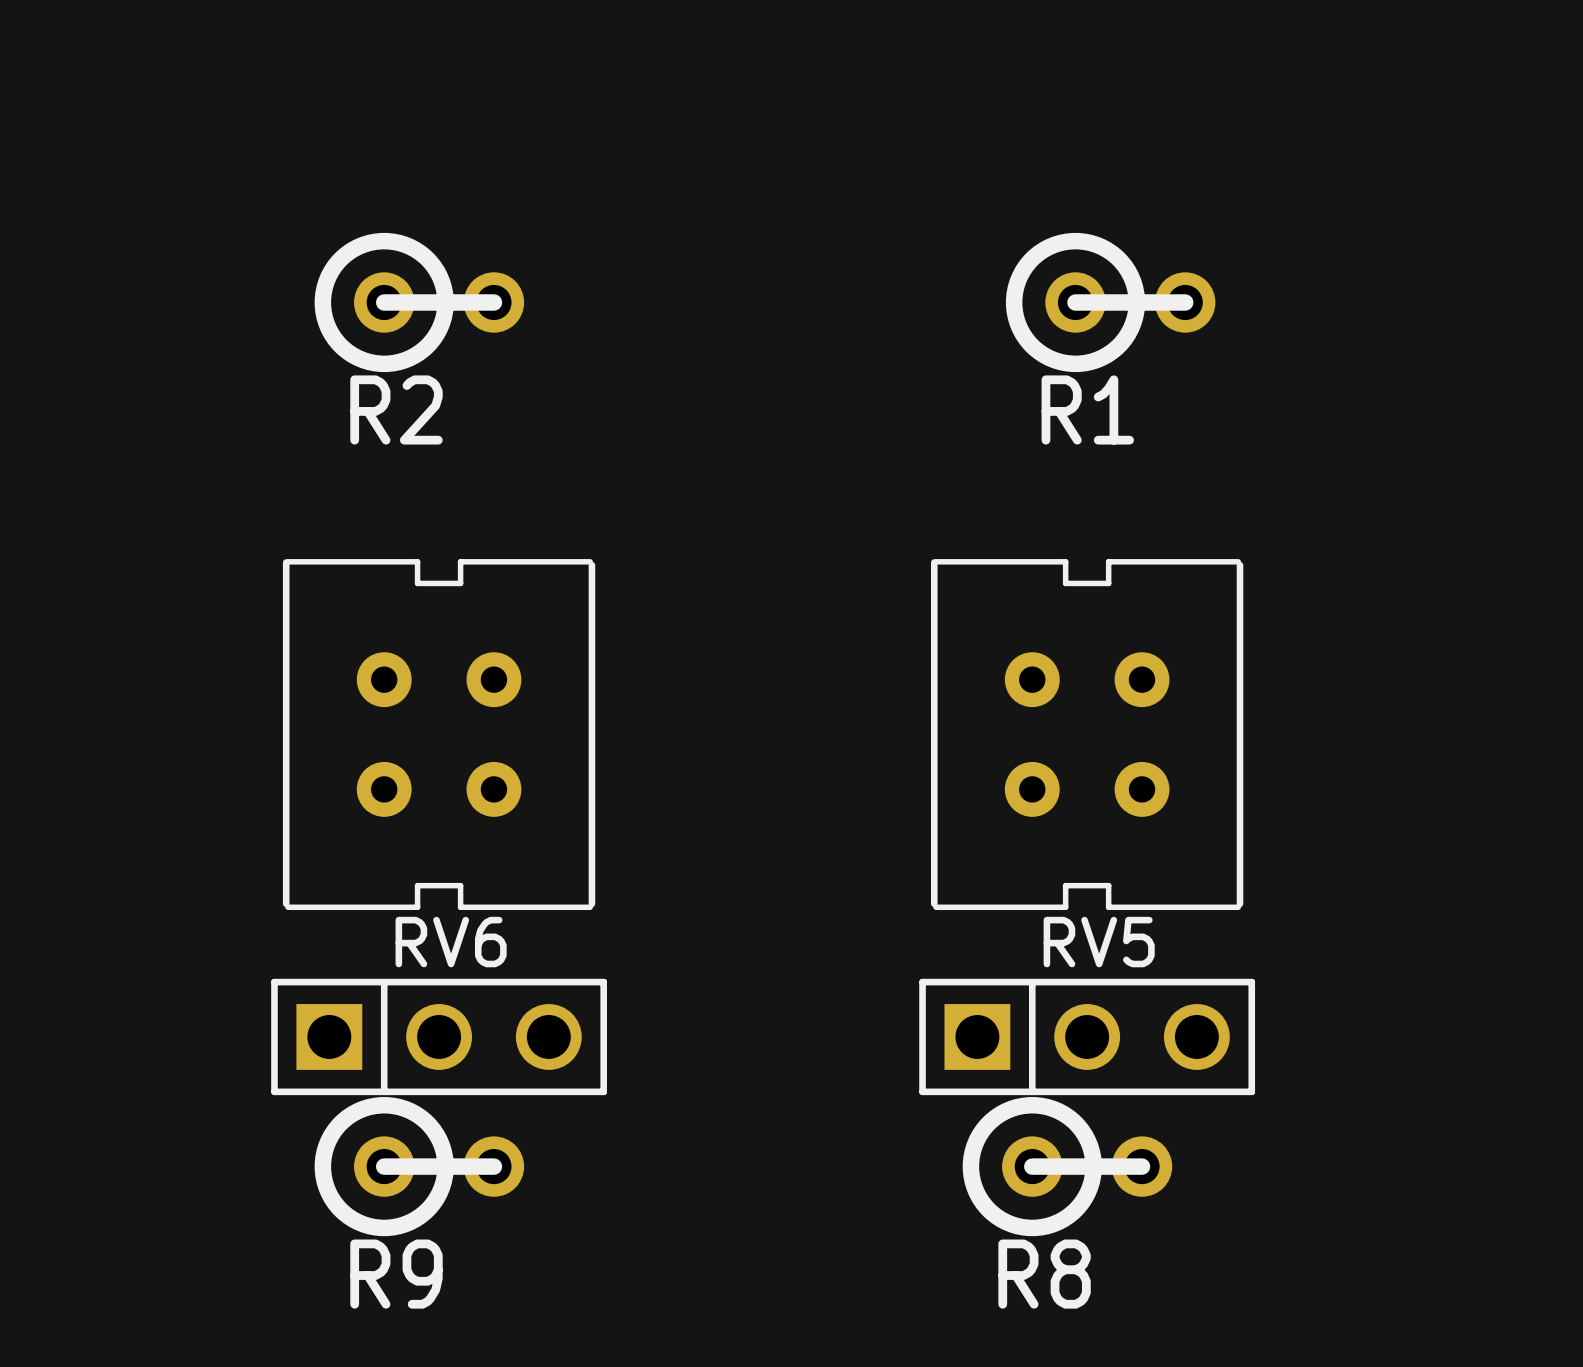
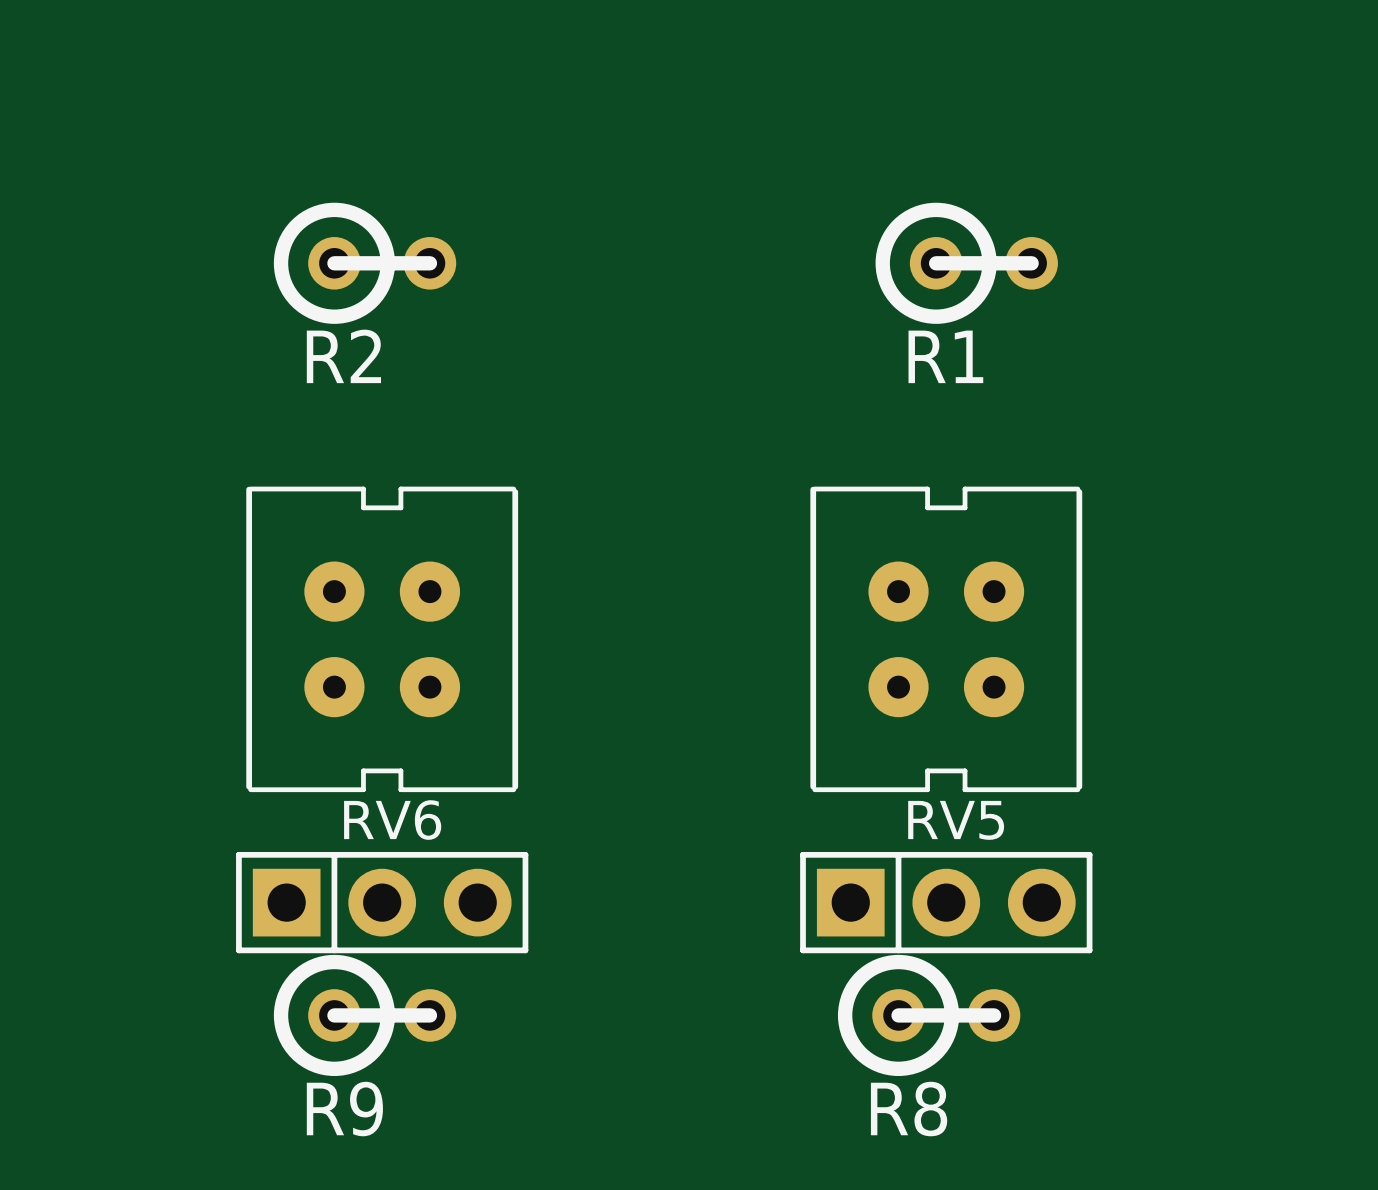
part footprint: [282, 559, 596, 911] -> [246, 486, 519, 793]
part footprint: [930, 559, 1244, 911] -> [810, 486, 1083, 793]
RV6 footprint: [271, 978, 607, 1096] -> [236, 851, 529, 954]
RV5 footprint: [919, 978, 1256, 1096] -> [800, 851, 1093, 954]

